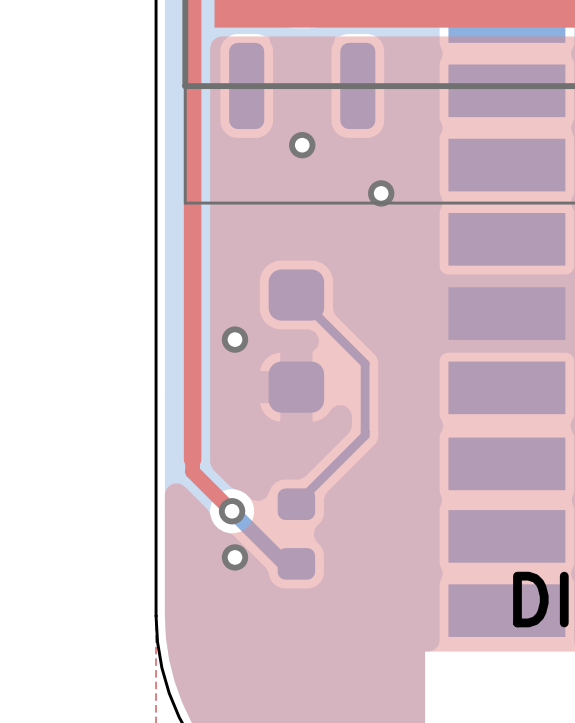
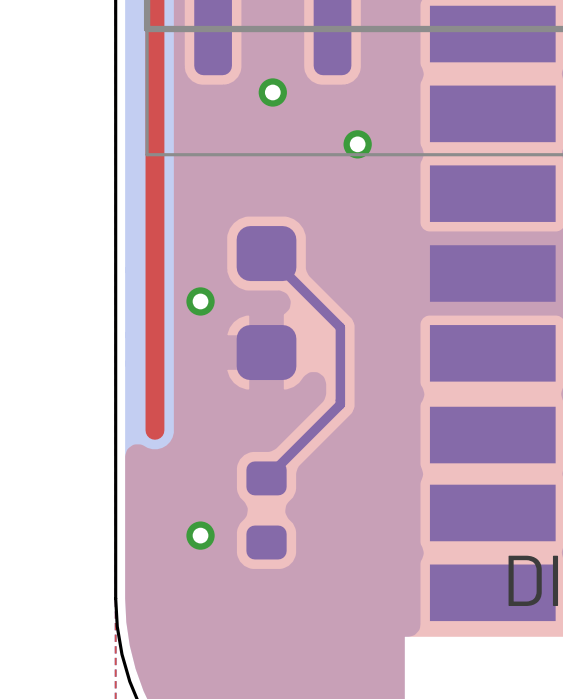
top track: (192, 459) (192, 471) (232, 511) -> none
bottom track: (232, 511) (284, 563) (296, 563) -> none
via: (232, 511) -> none

